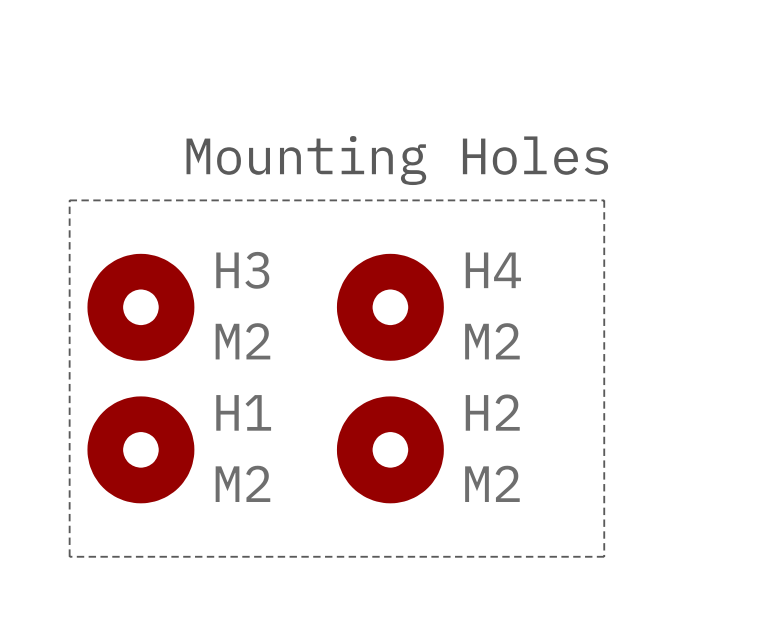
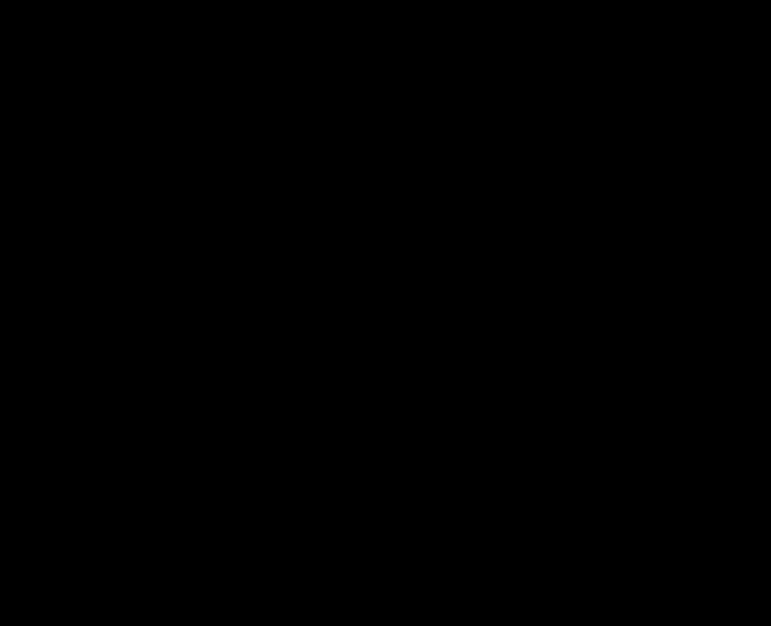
text: Mounting Holes (397, 160) -> none
line: (69, 200) (604, 200) (604, 556) (69, 556) (69, 200) -> none
H3: M2 (140, 307) -> none
H4: M2 (390, 307) -> none
H1: M2 (140, 449) -> none
H2: M2 (390, 449) -> none

